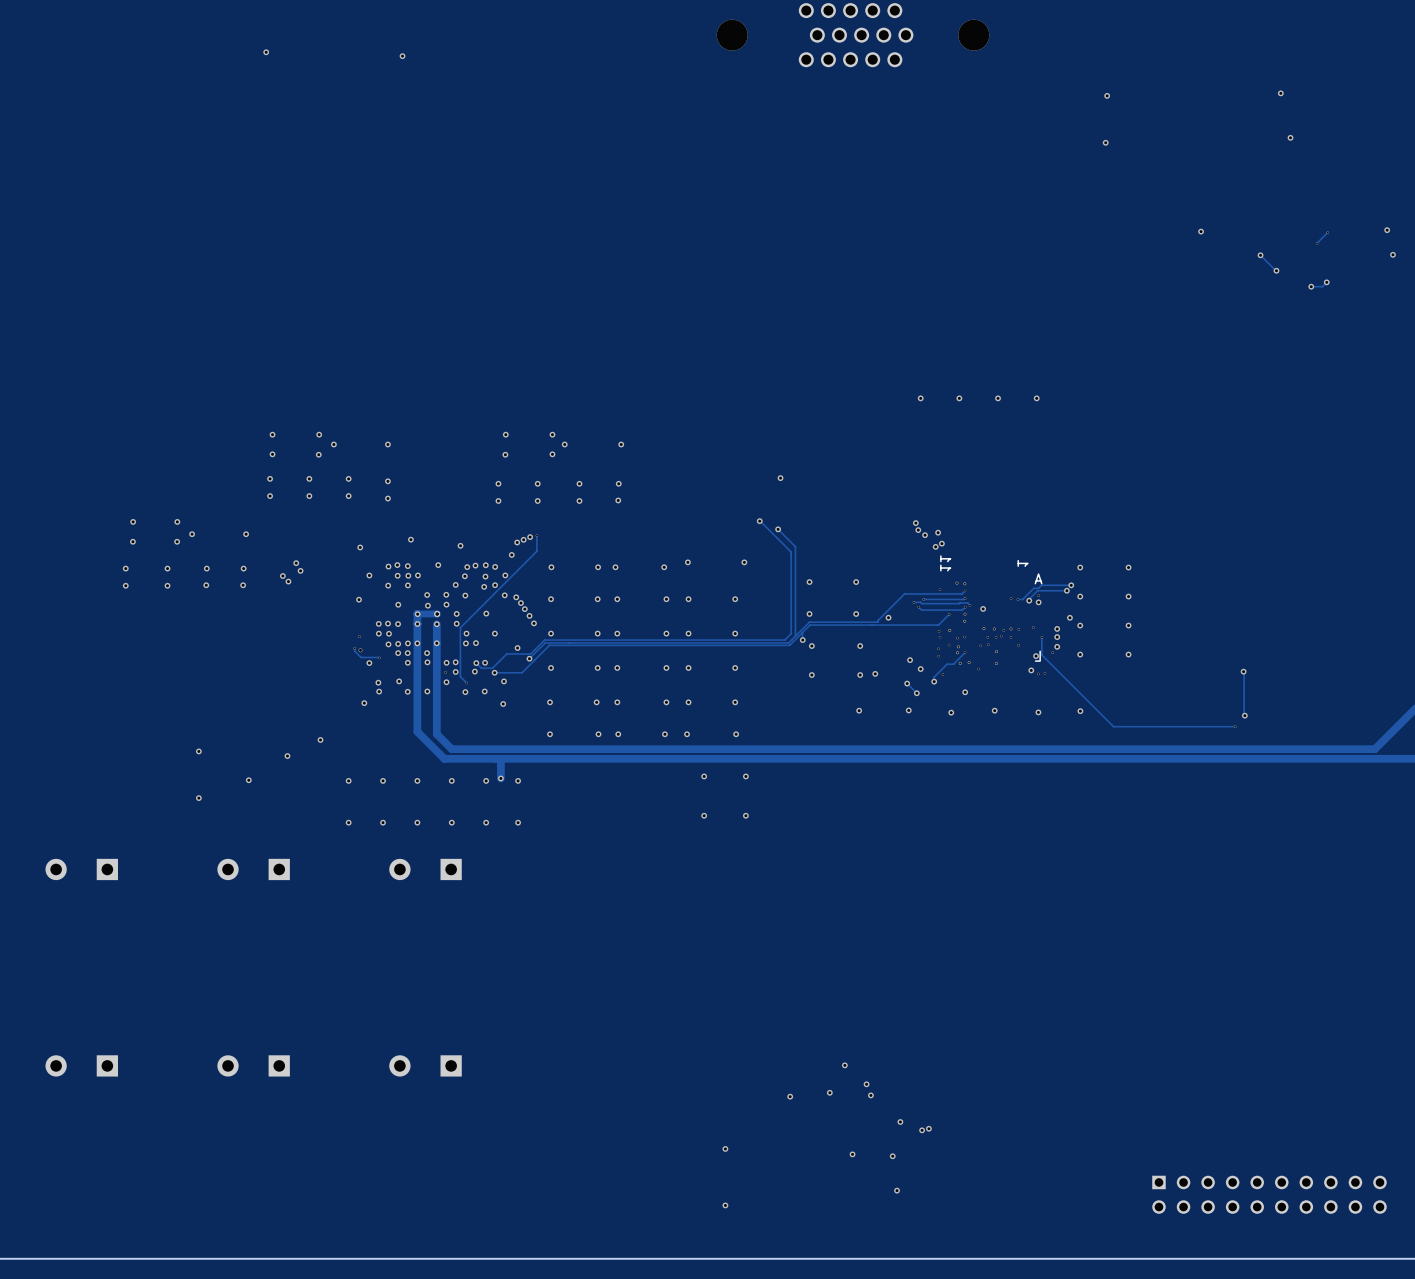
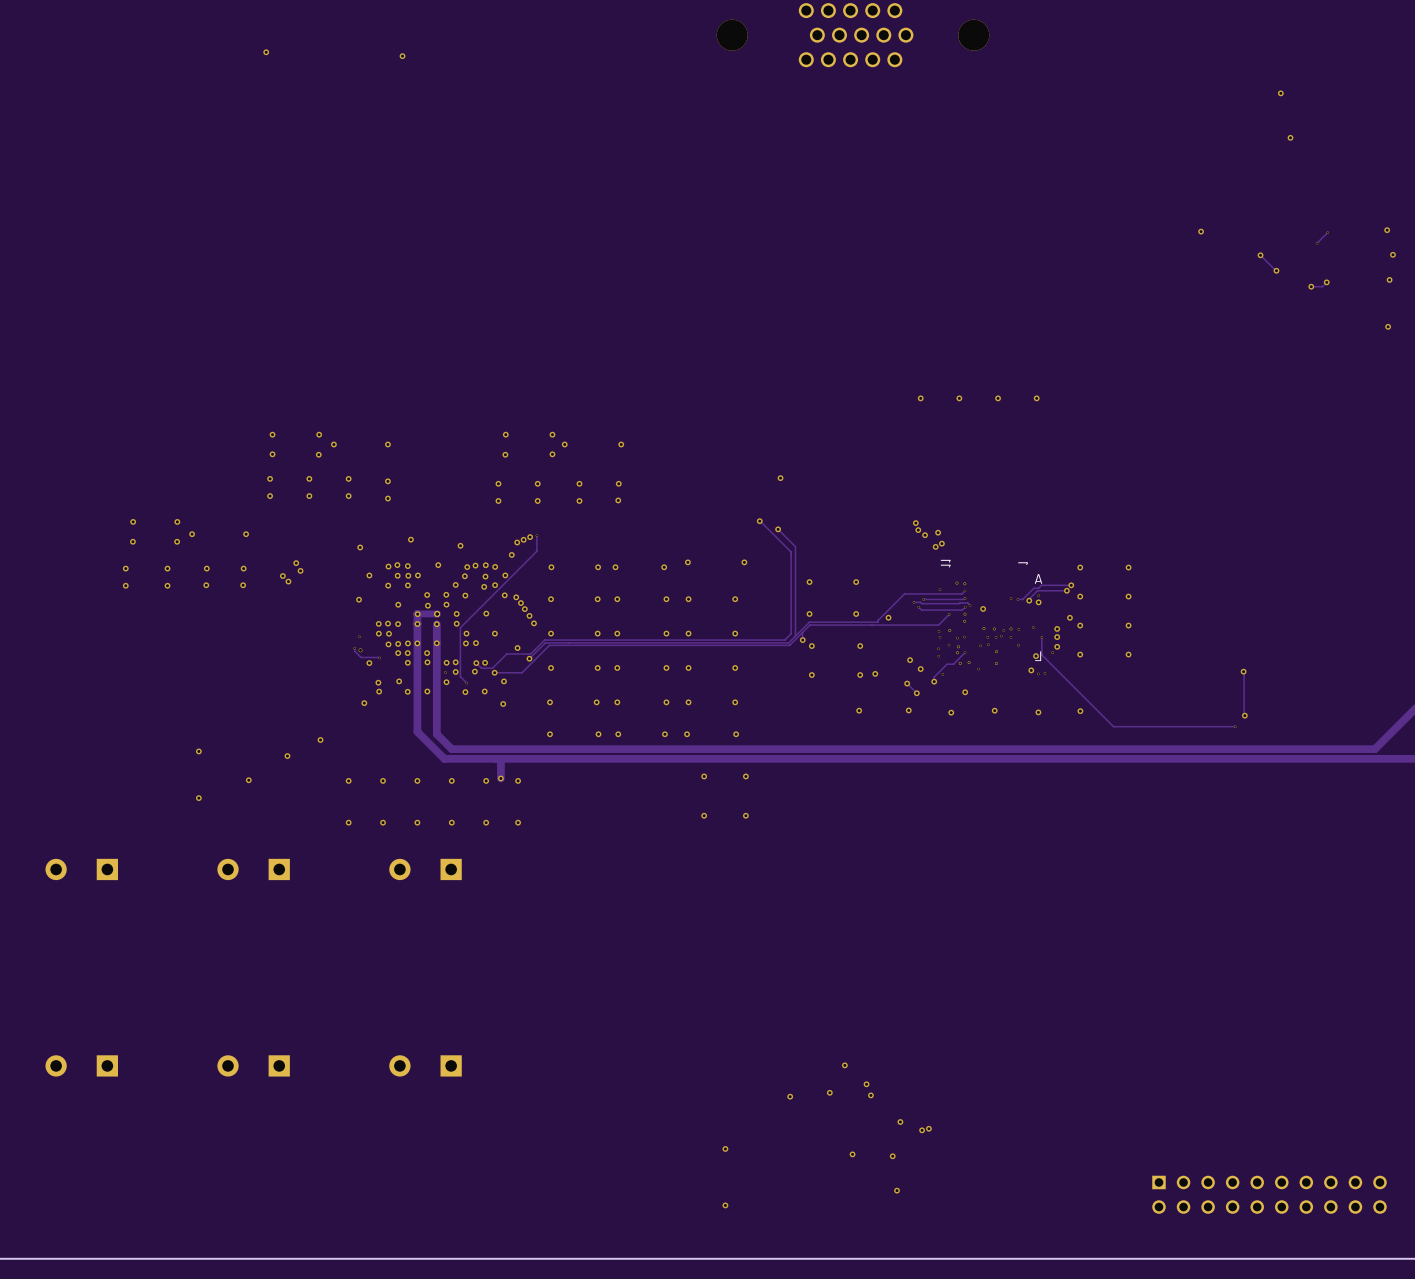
via: (1107, 95) -> none
via: (1105, 142) -> none
via: none -> (1389, 279)
via: none -> (1388, 326)

